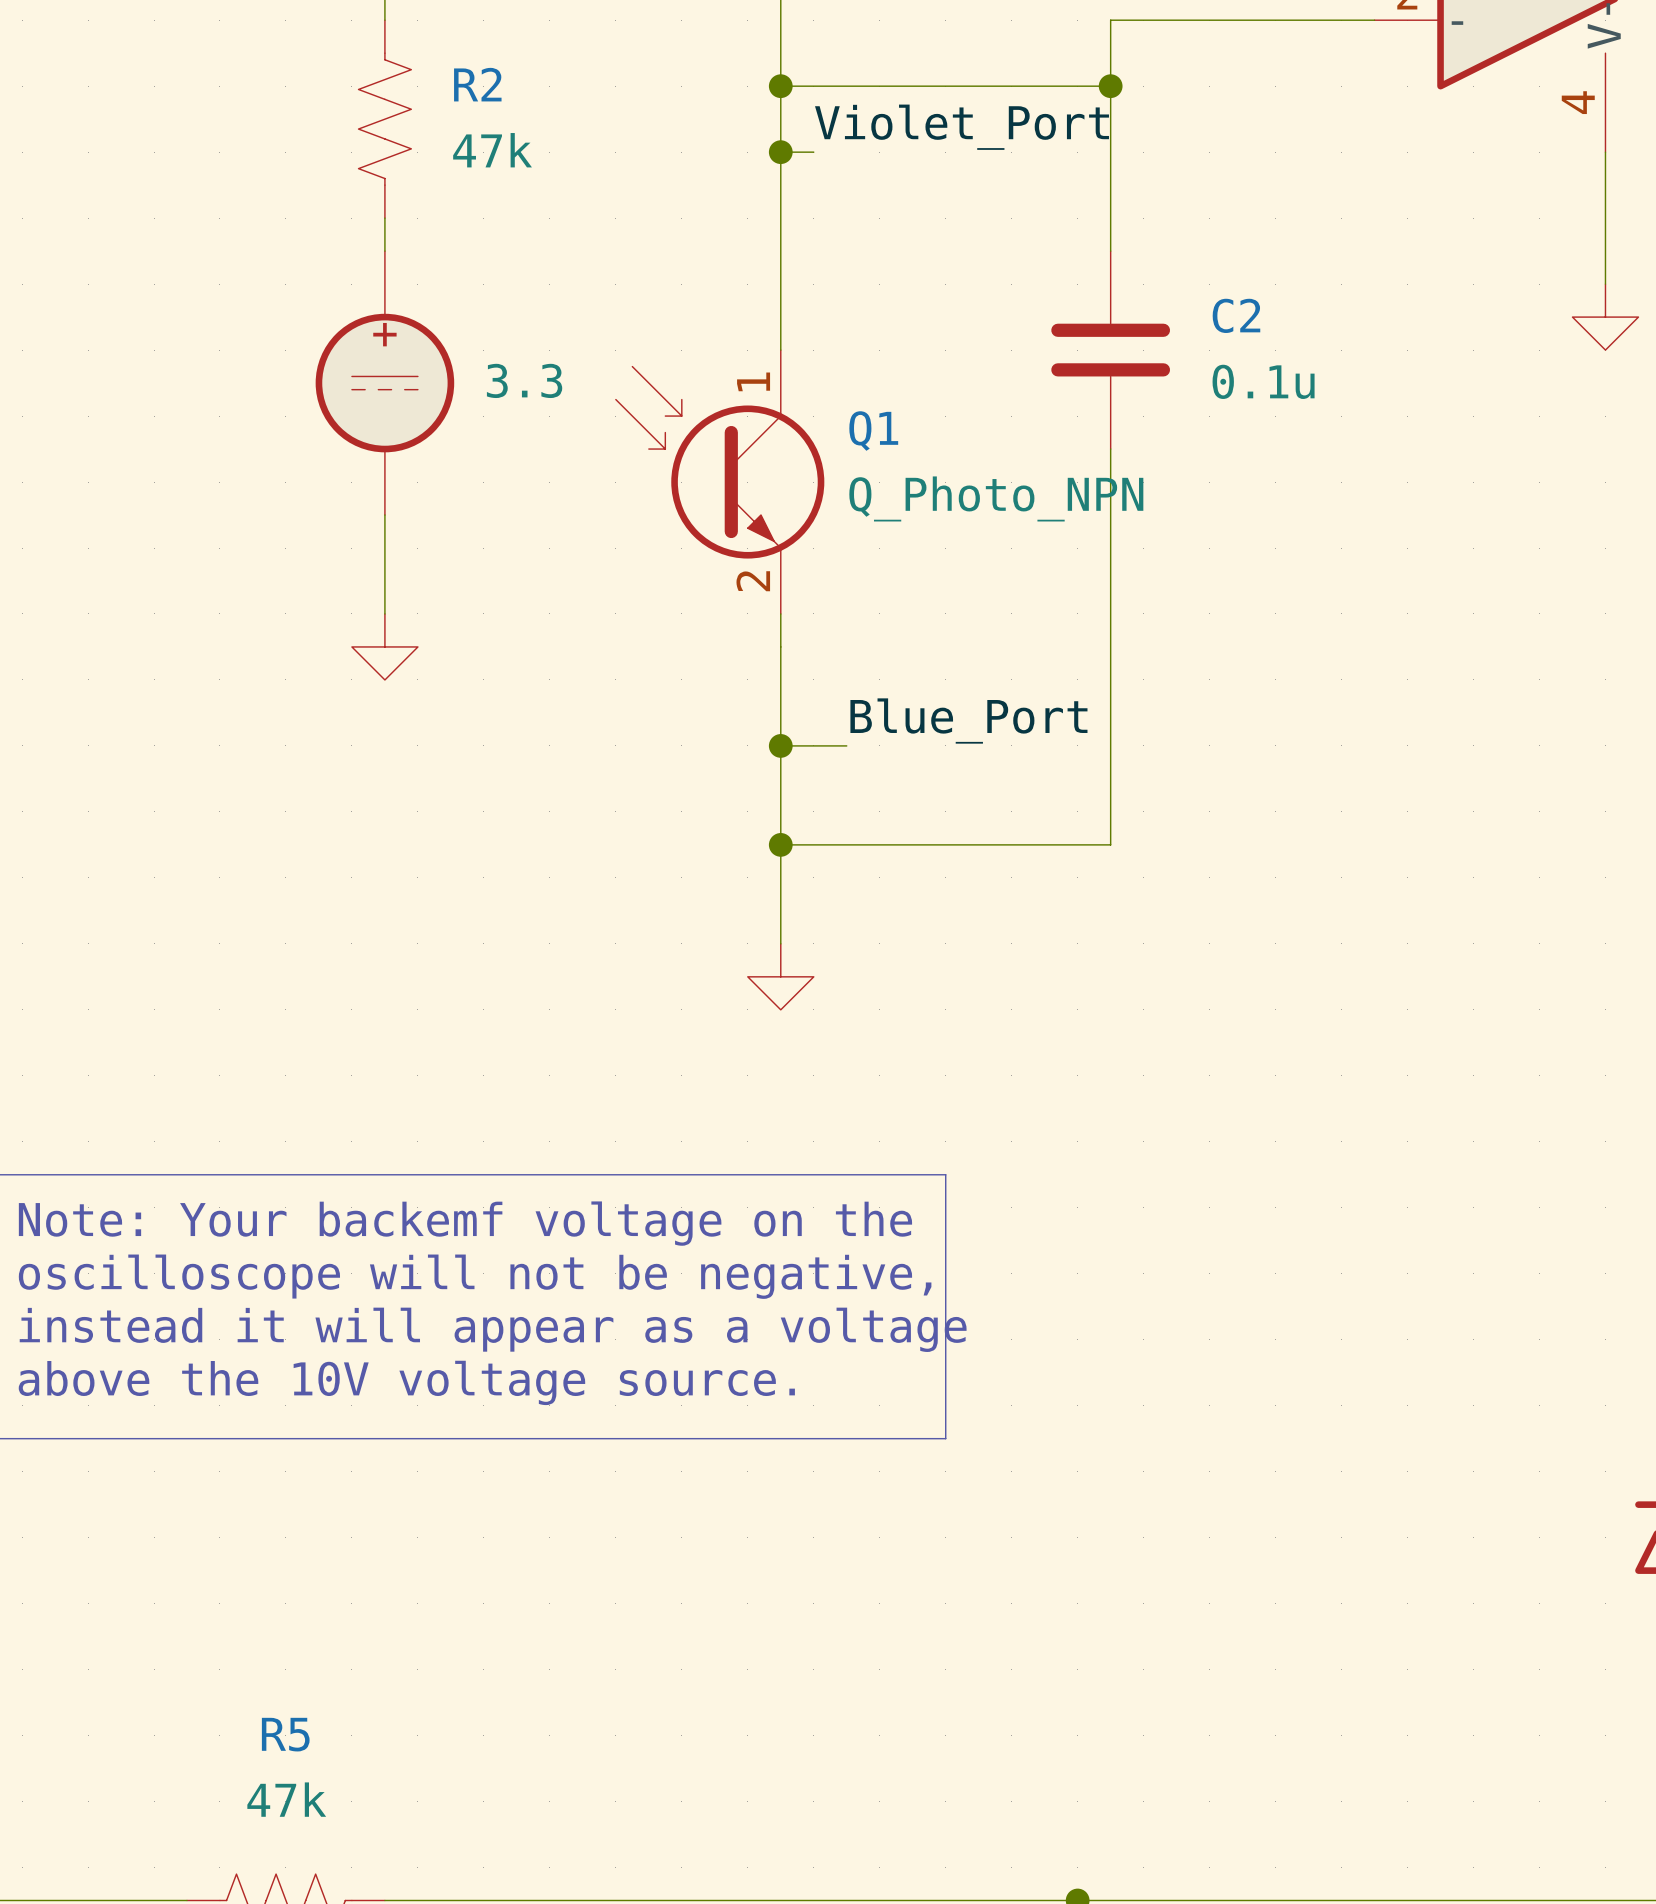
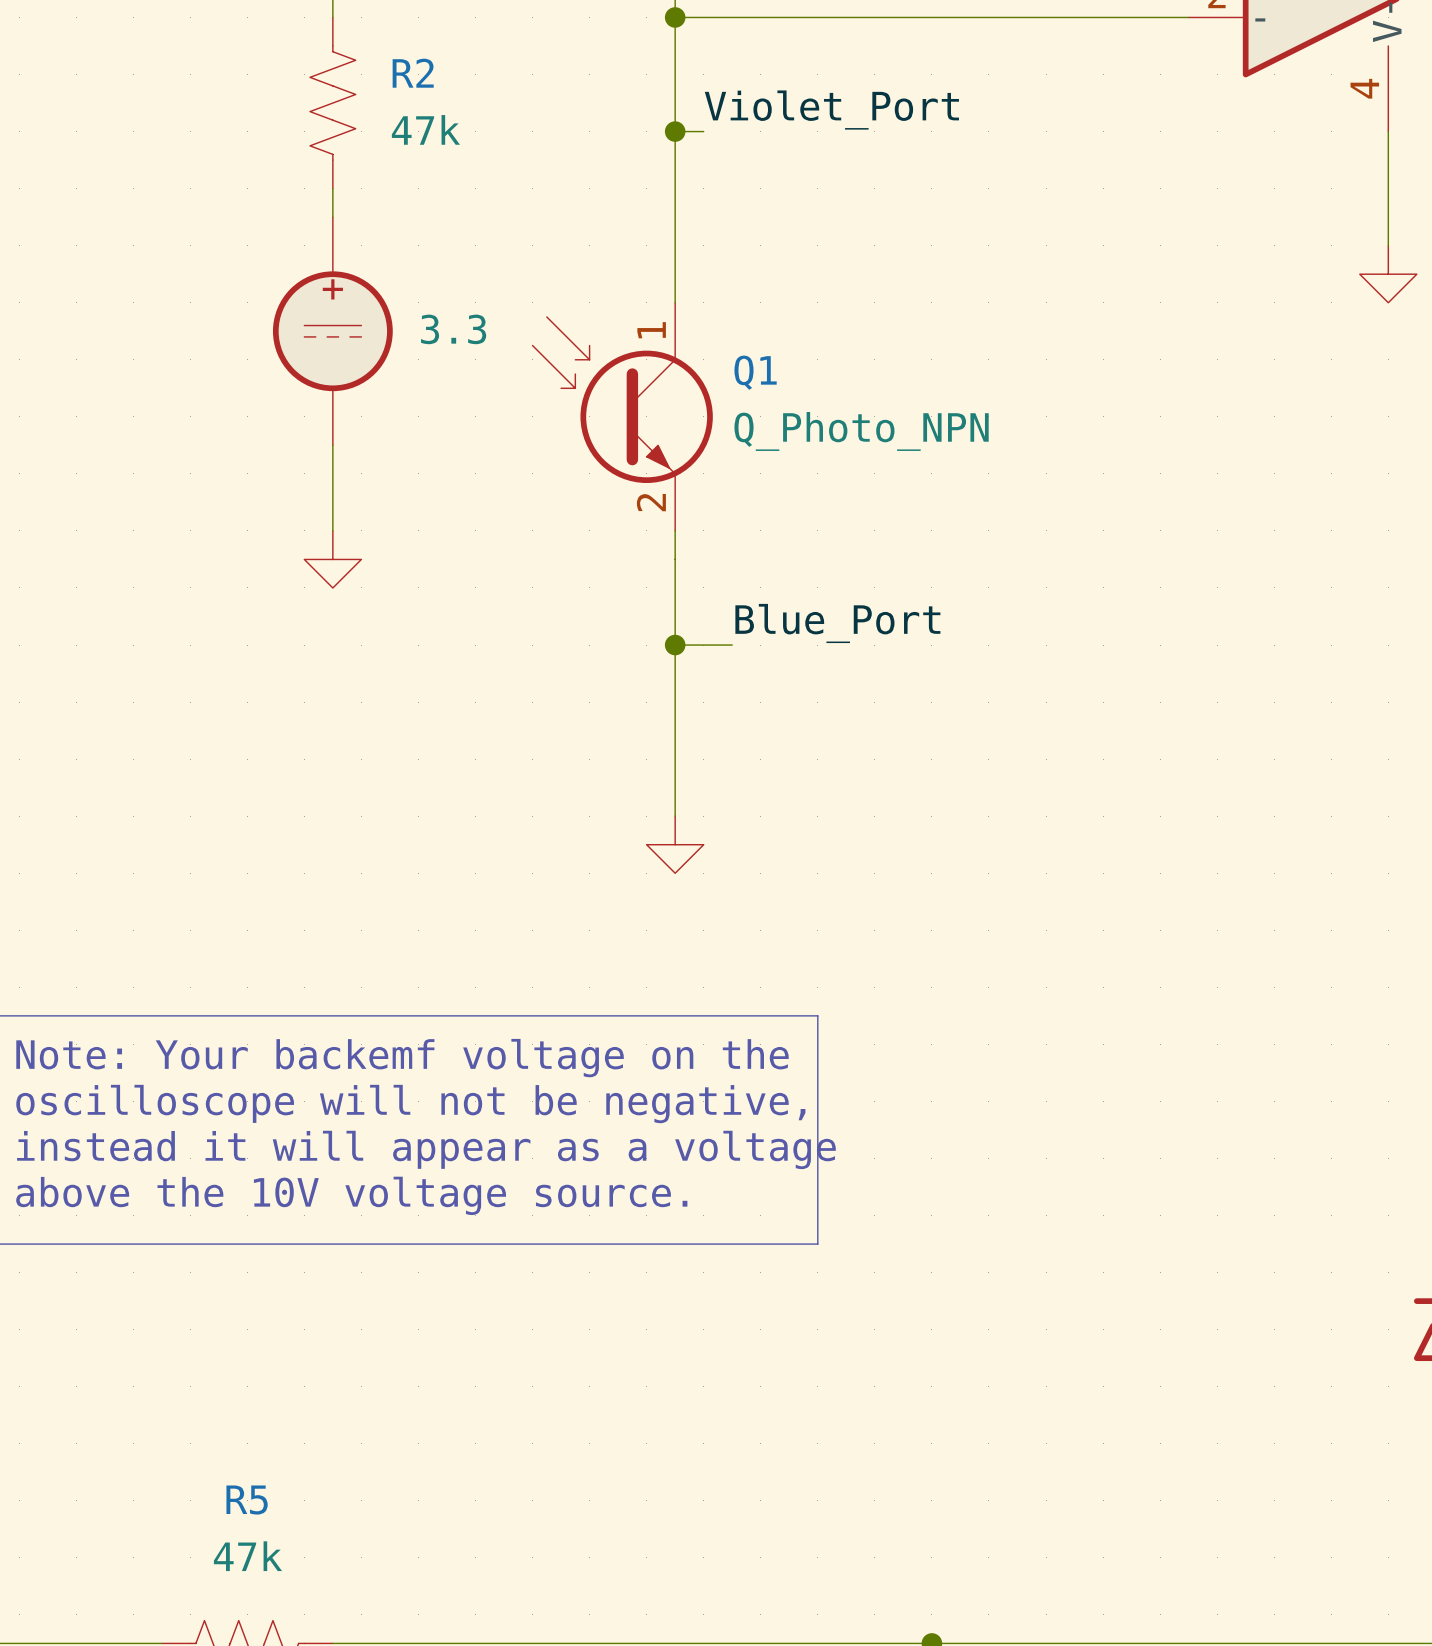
wire: (1110, 20) (1110, 251) -> (960, 17) (675, 17)
wire: (780, 86) (1110, 86) -> none
junction position: (780, 86) -> (675, 17)
junction: (1110, 86) -> none
C2: 0.1u (1110, 350) -> none
wire: (1110, 449) (1110, 844) (780, 844) -> none
junction: (780, 844) -> none

